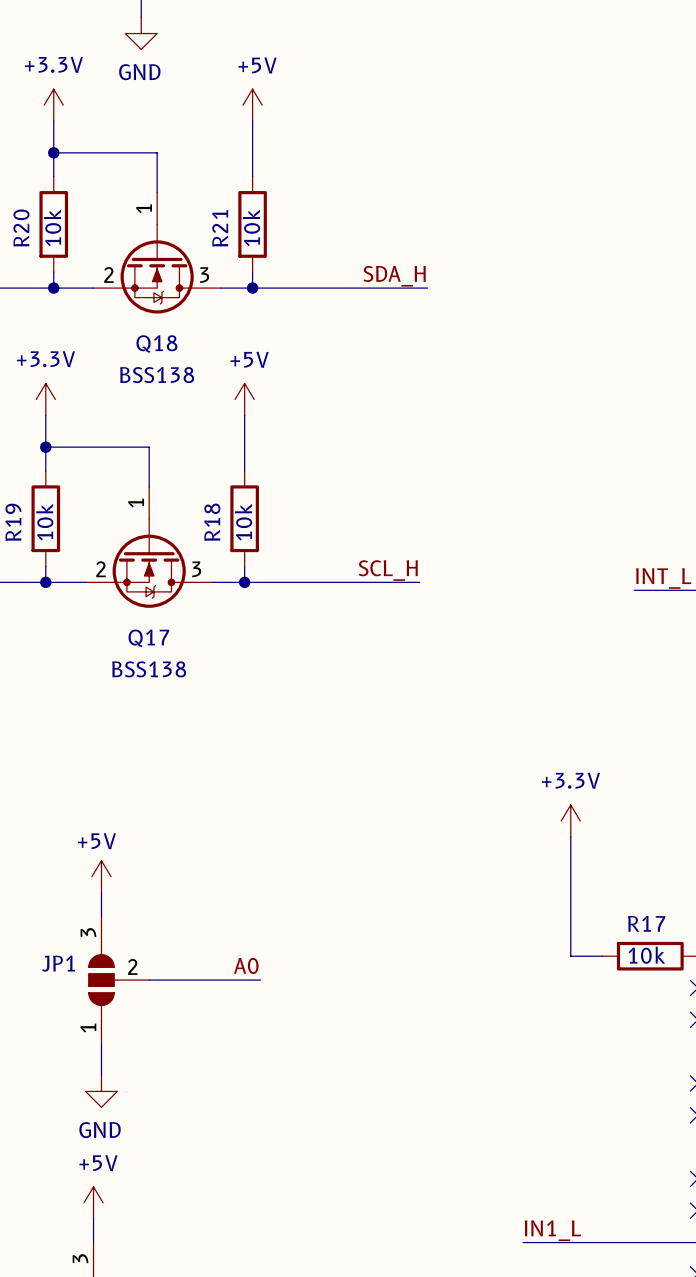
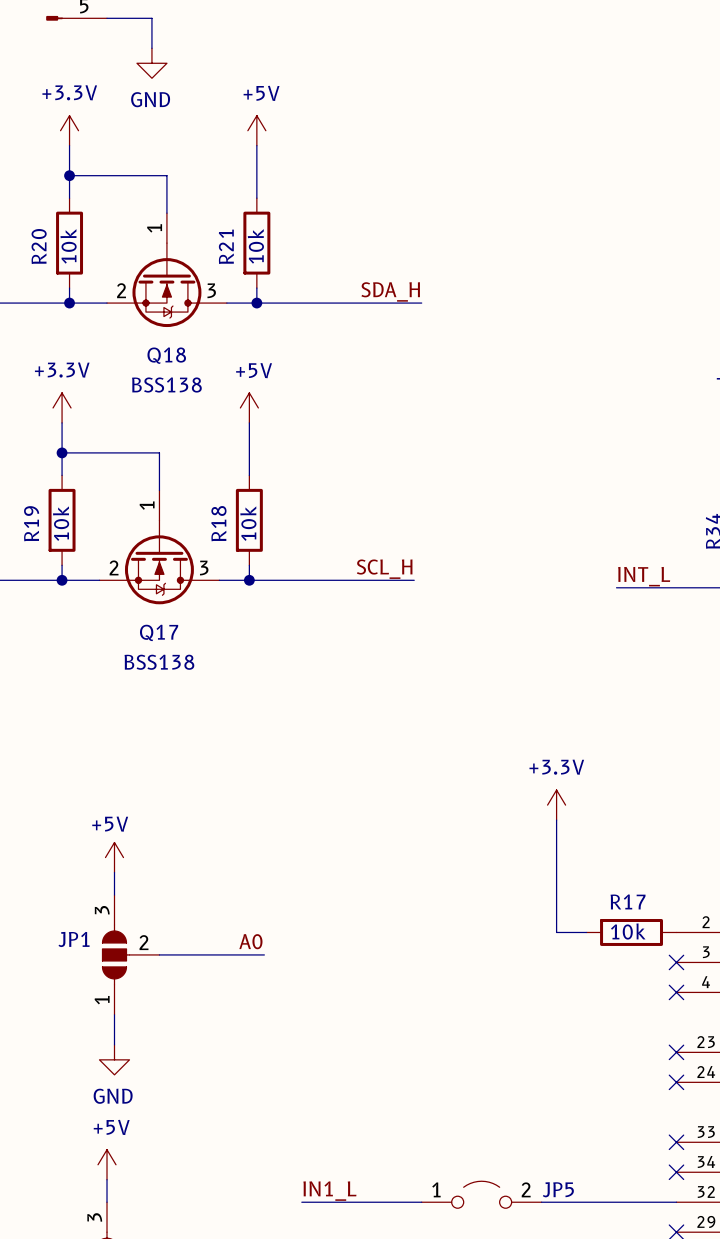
label position: IN1_L (552, 1230) -> IN1_L (329, 1191)
JP5: none -> (481, 1194)
wire: none -> (301, 1202) (421, 1202)

